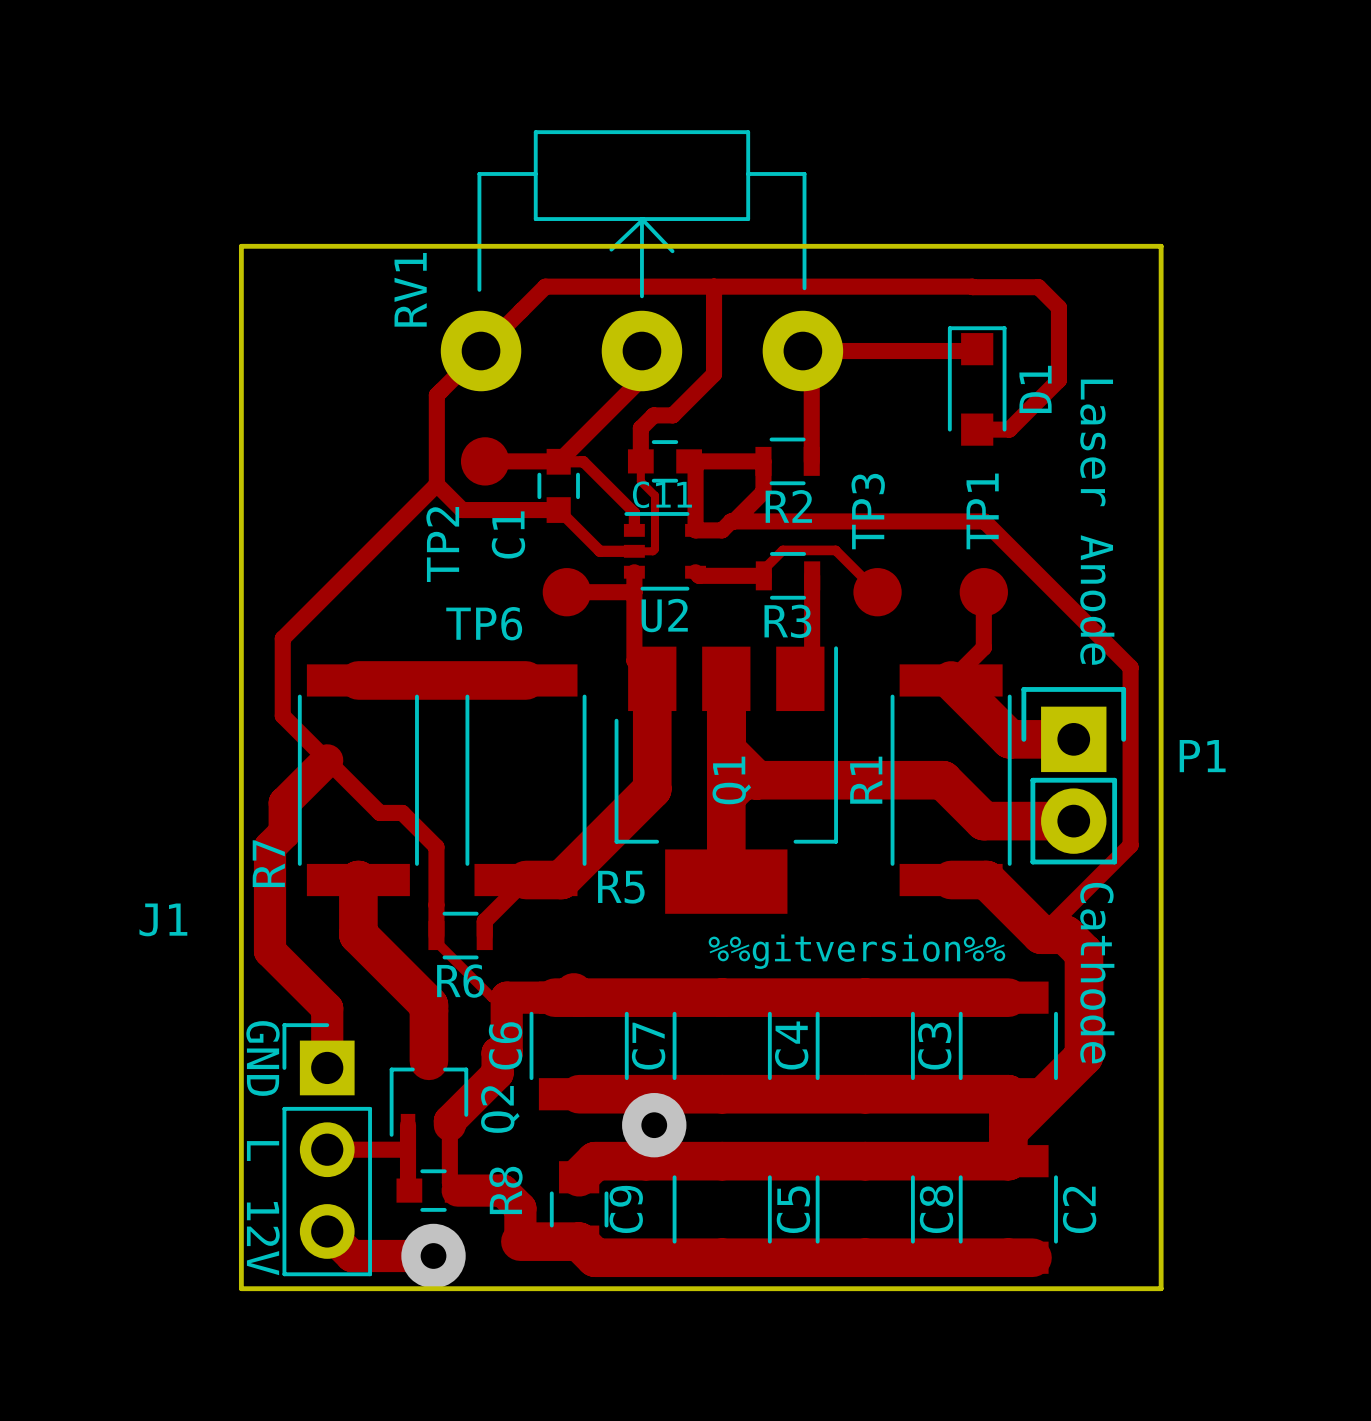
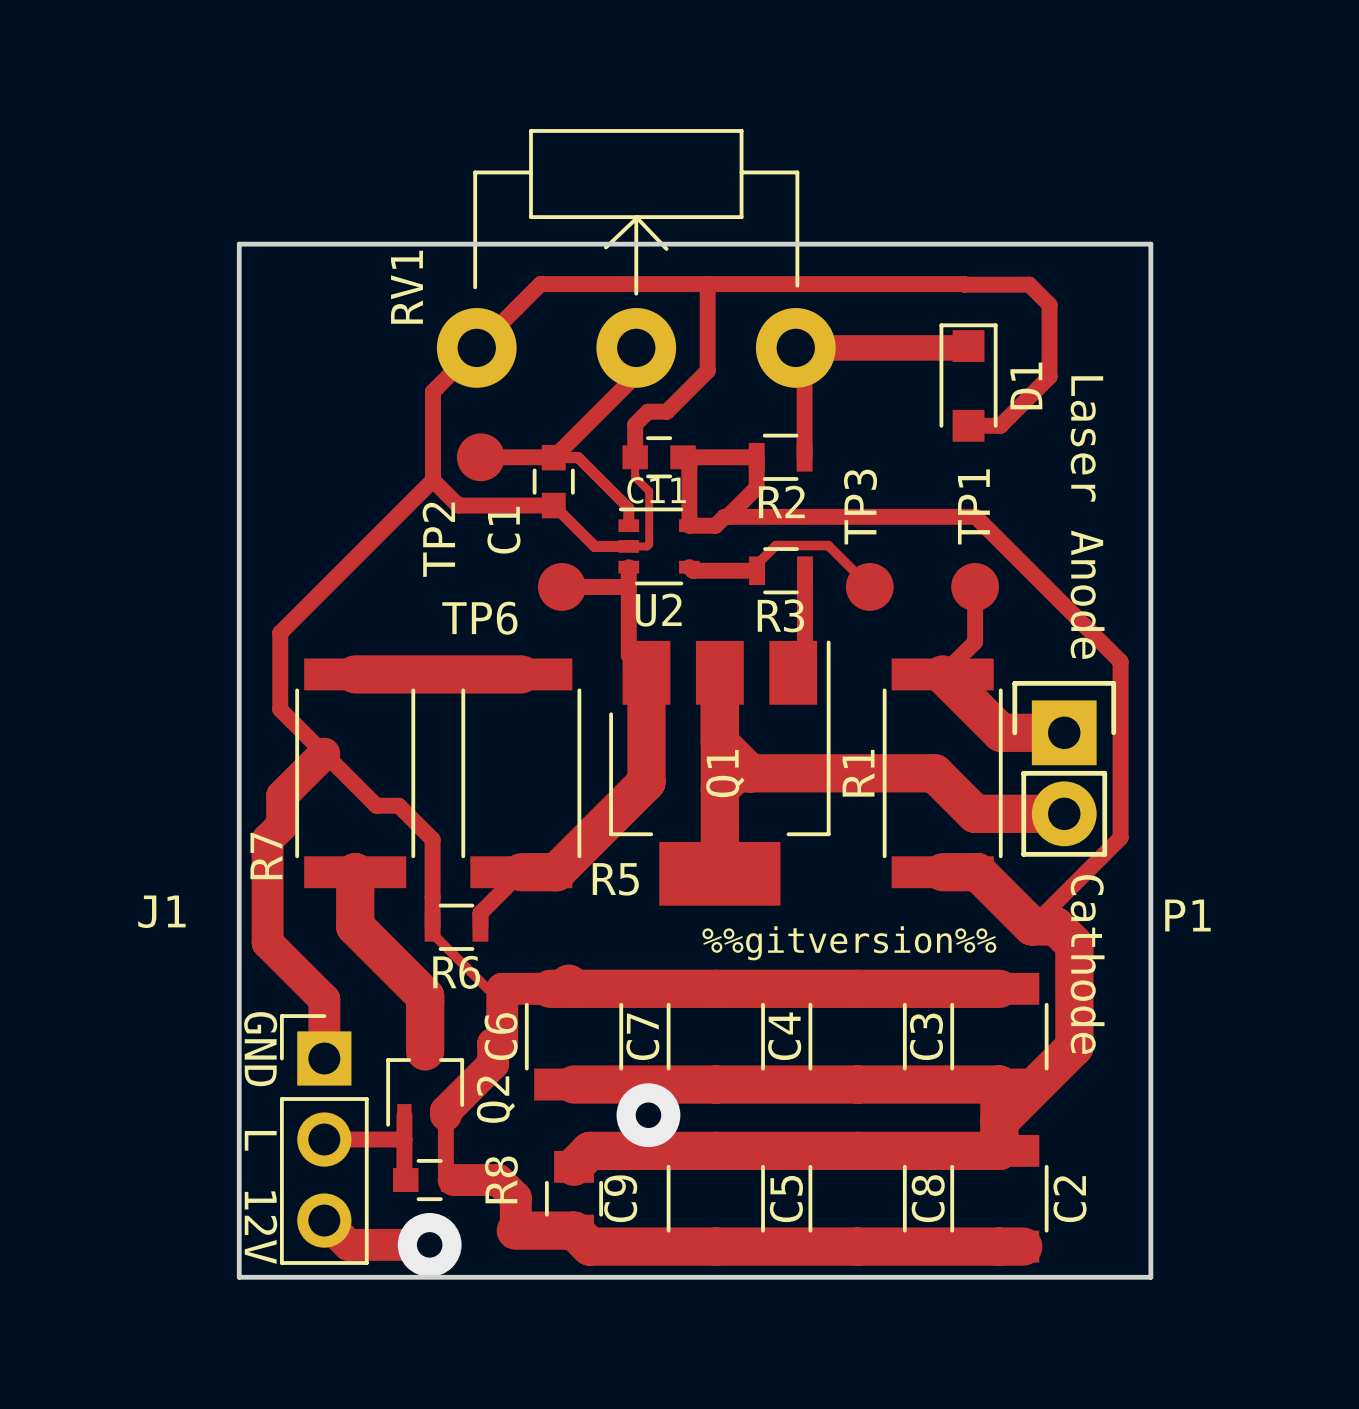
track width: thin (802, 351) (975, 351) -> thick (795, 347) (966, 347)
P1 name position: P1 (1202, 756) -> P1 (1187, 915)

